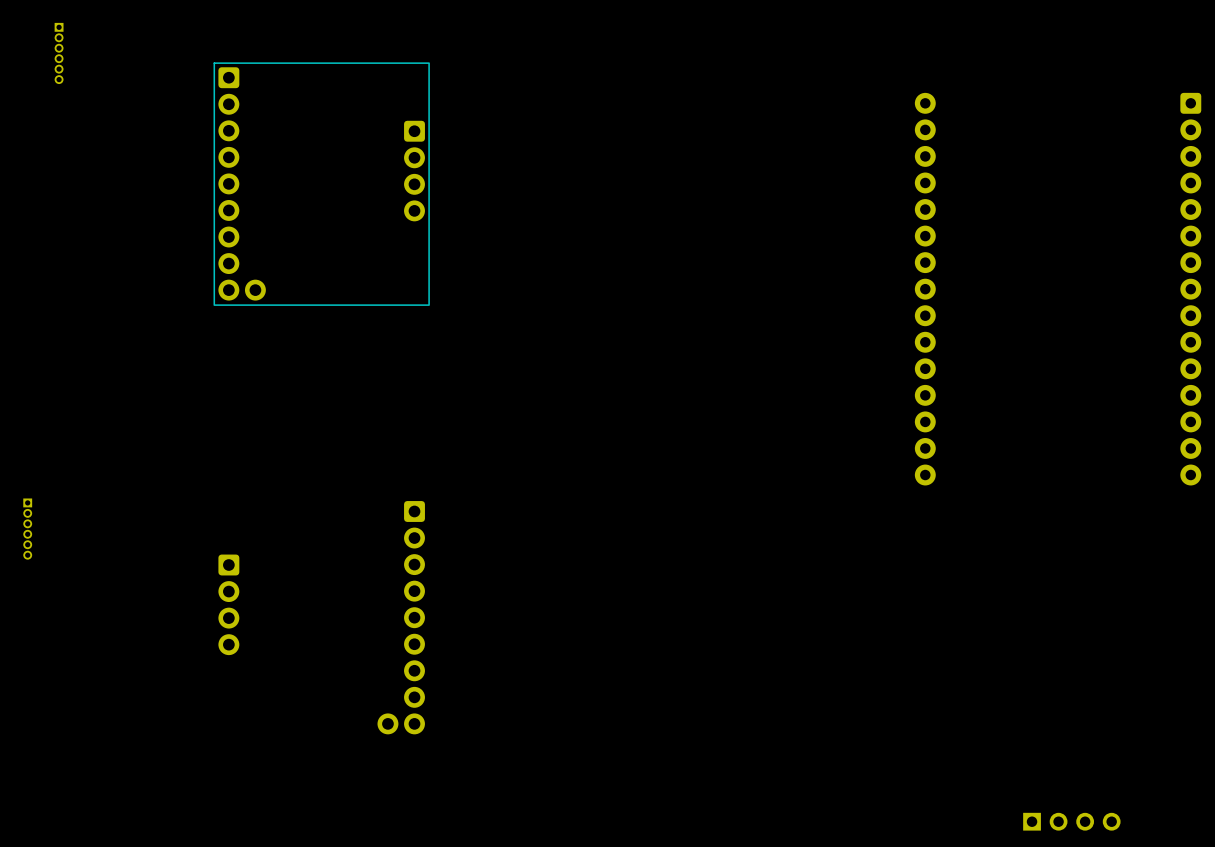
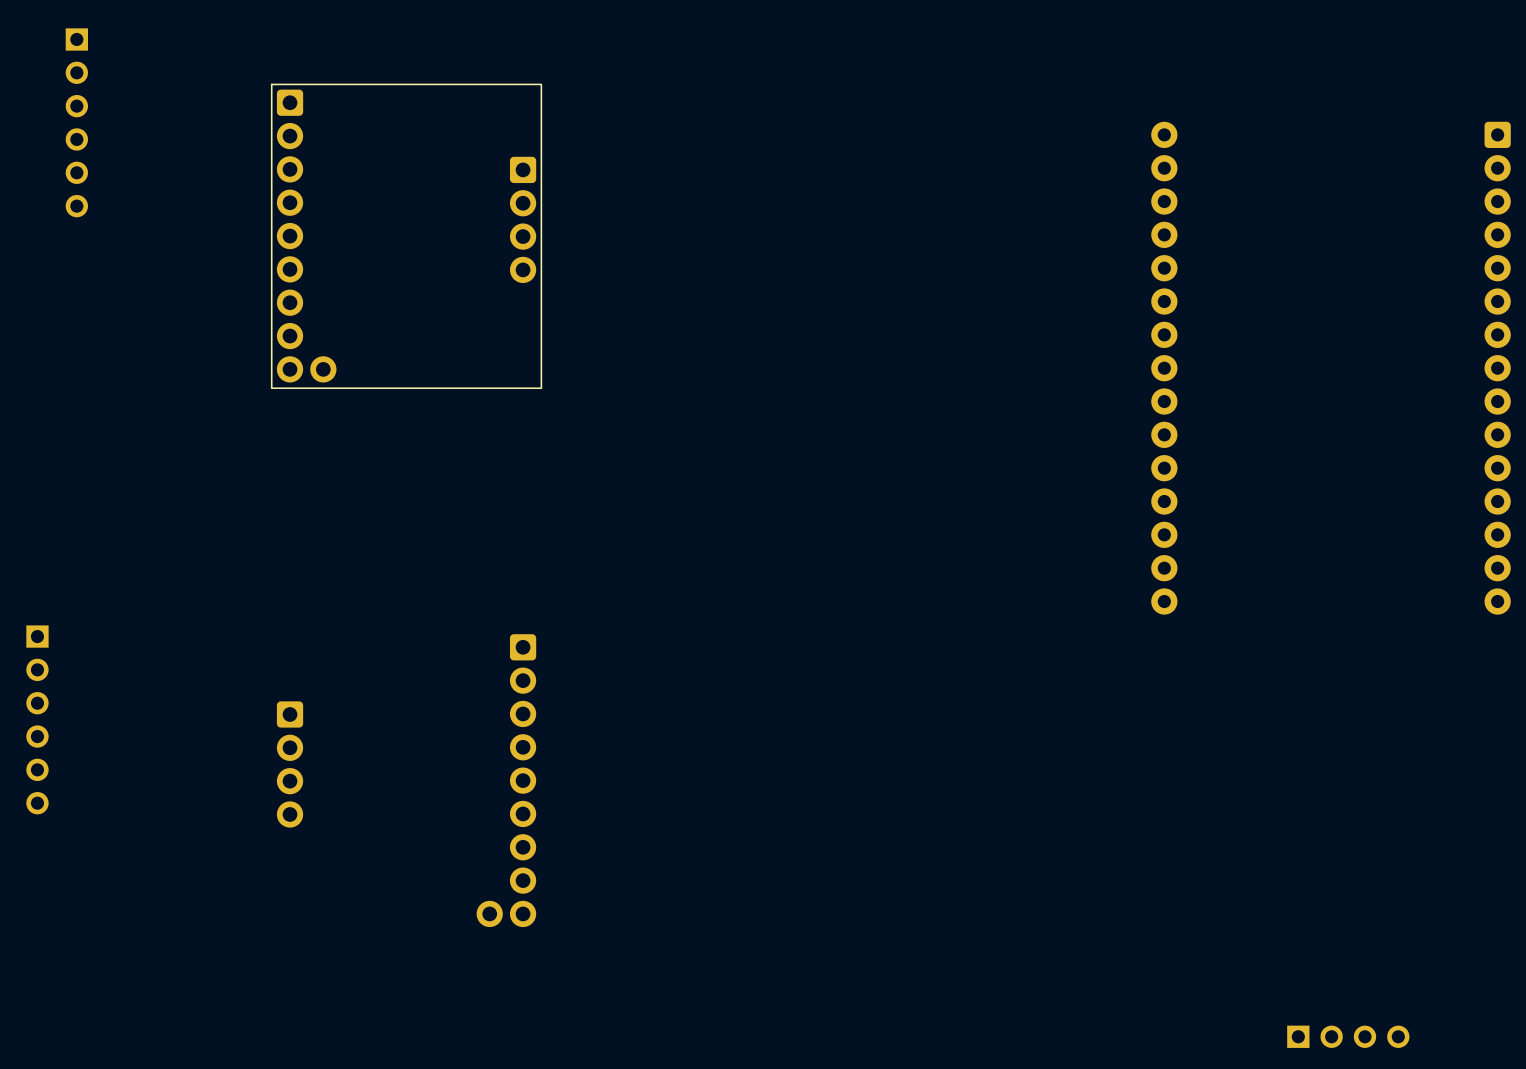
part: (59, 53) -> none
part: none -> (76, 122)
part: (27, 529) -> none
part: none -> (37, 719)

